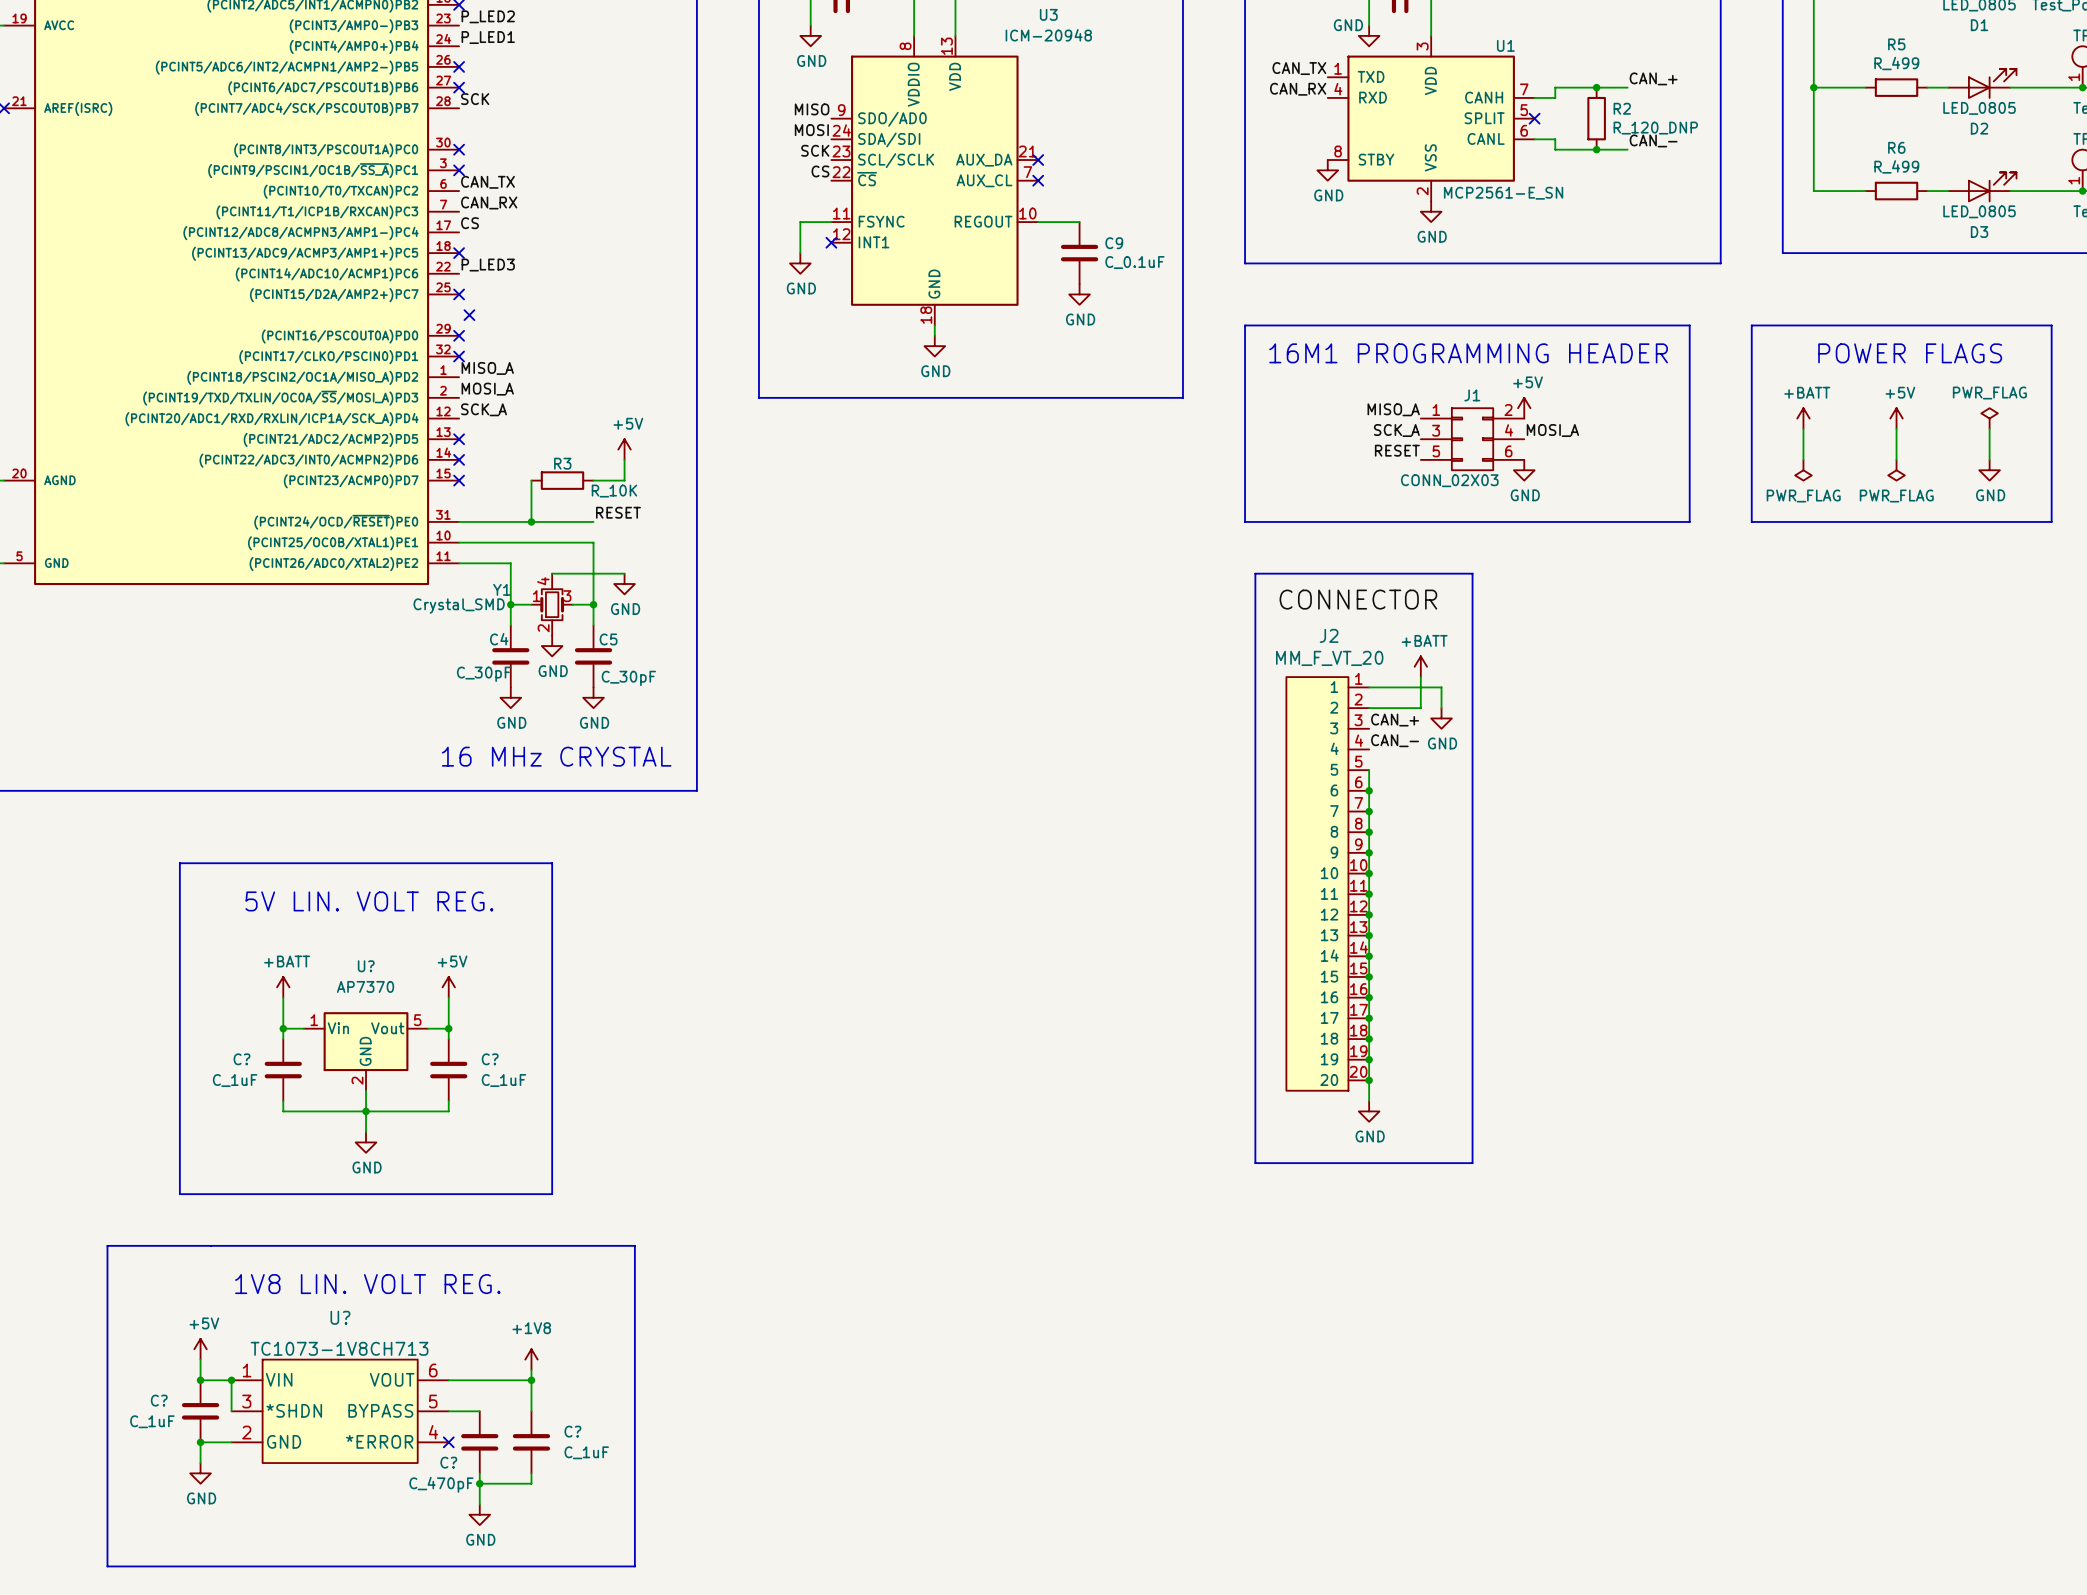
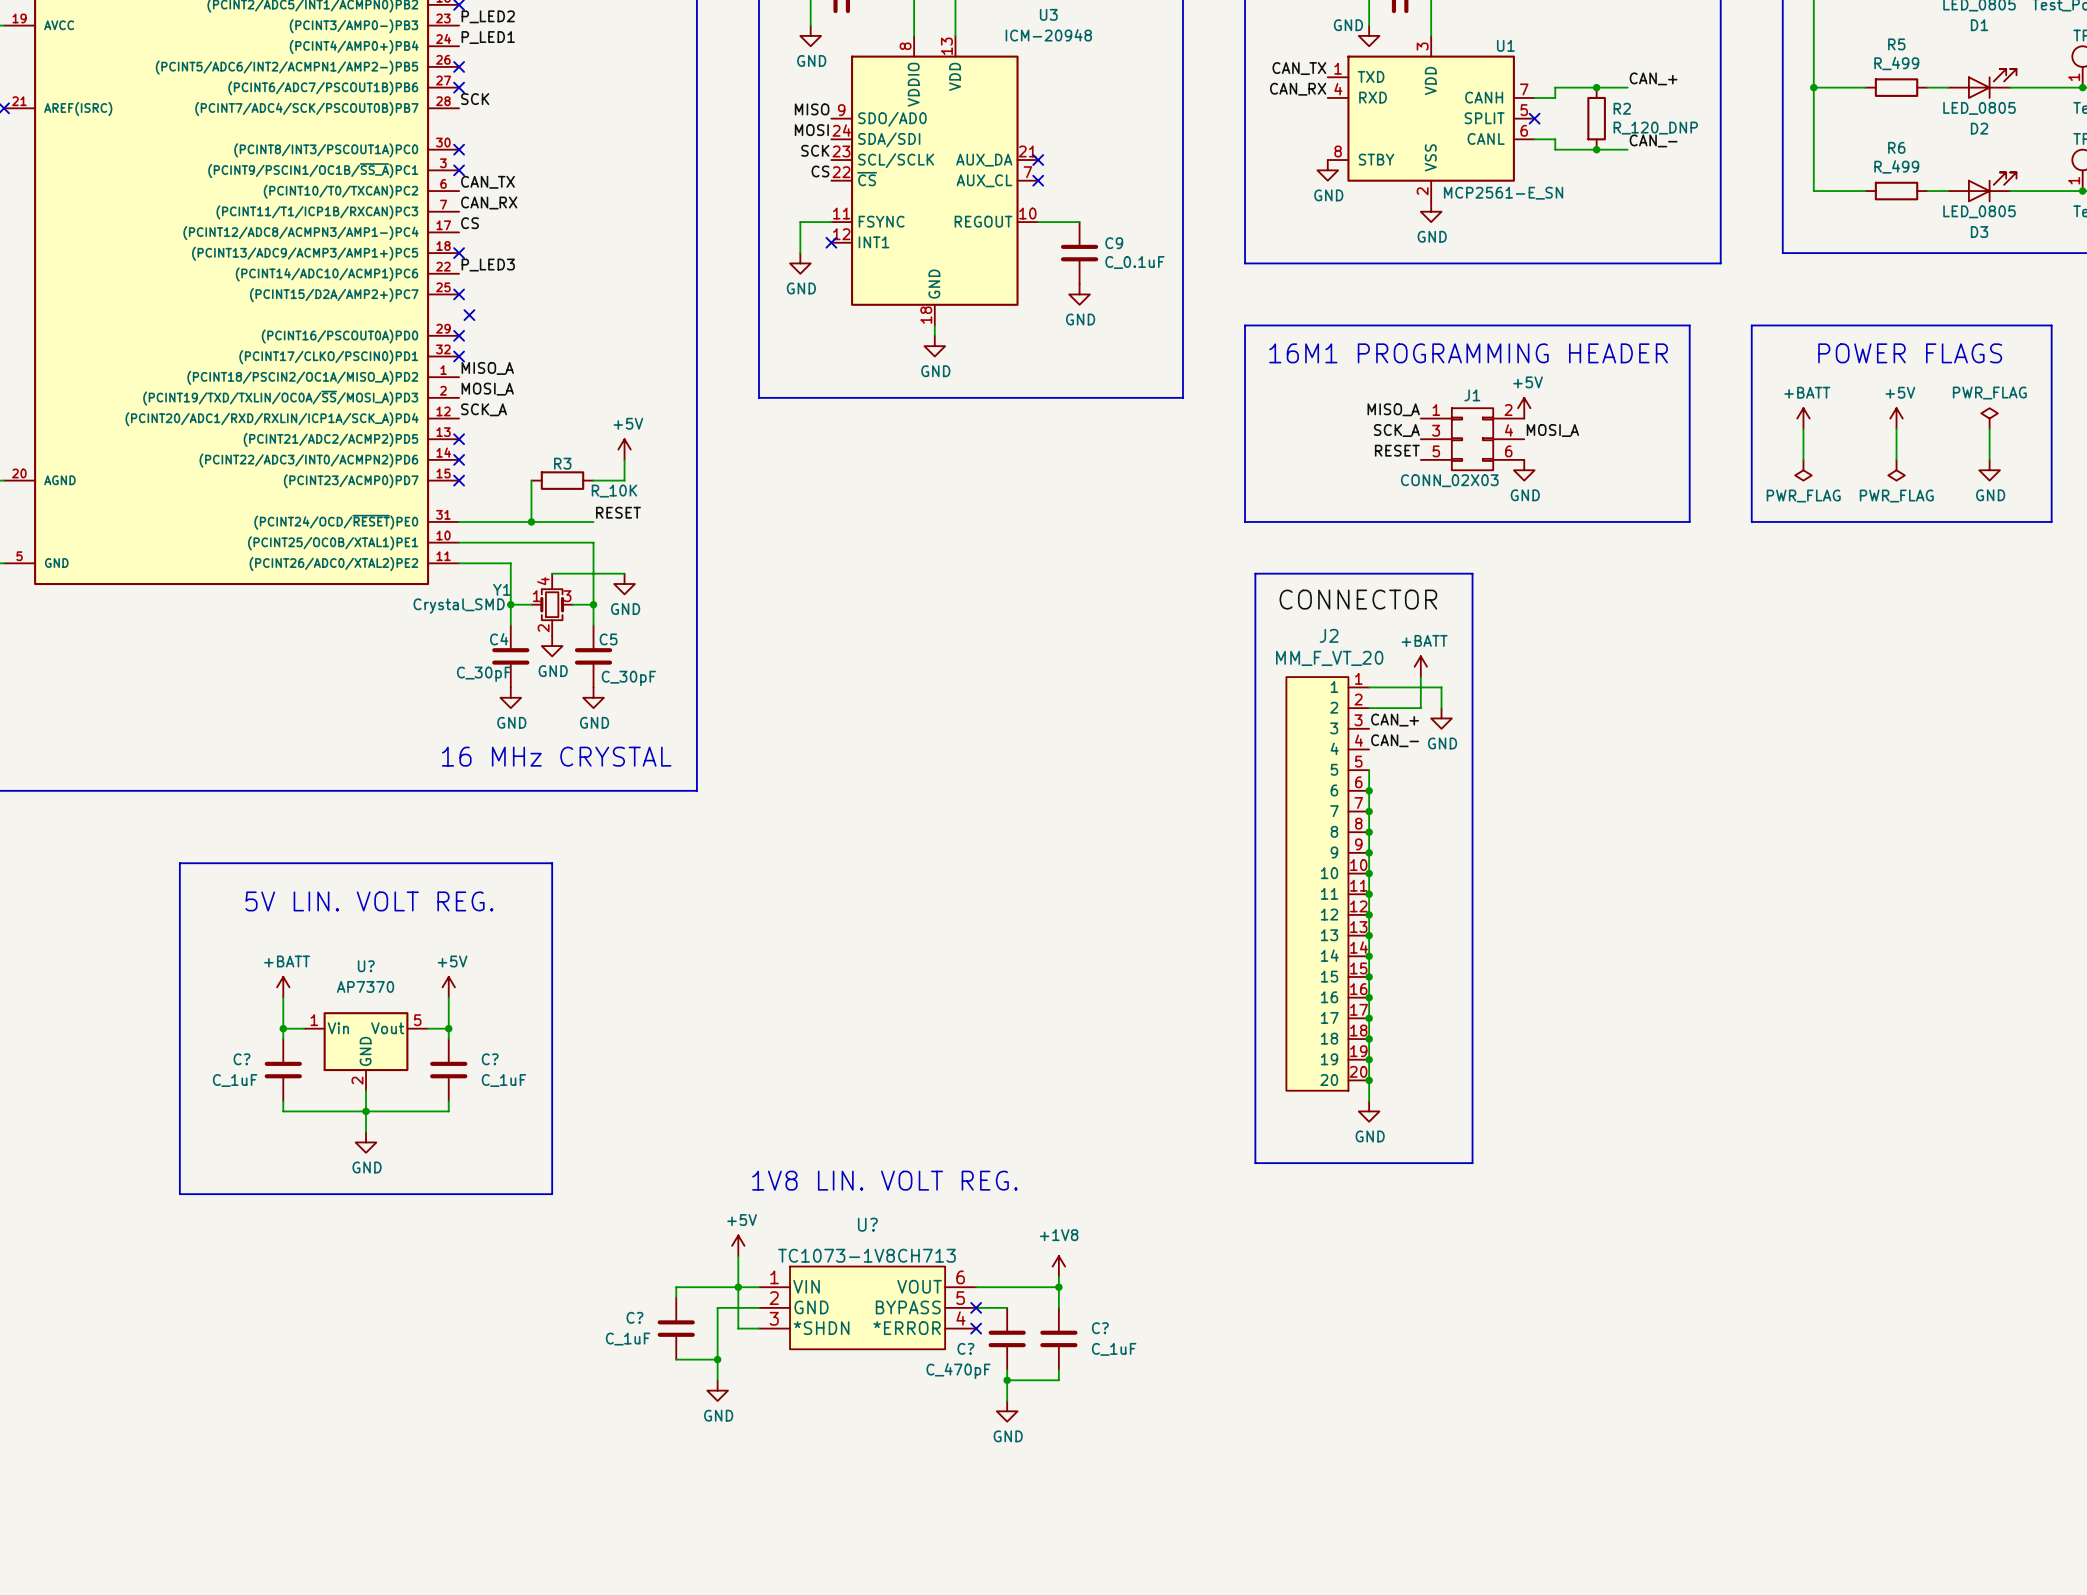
text: none -> 1V8 LIN. VOLT REG. (884, 1180)
line: (107, 1245) (634, 1245) (634, 1566) (107, 1566) (107, 1245) -> none
power symbol: none -> +5V (738, 1245)
wire: none -> (738, 1256) (738, 1328) (758, 1328)
power symbol: none -> +1V8 (1058, 1266)
wire: none -> (1058, 1276) (1058, 1307)
text: 1V8 LIN. VOLT REG. (367, 1284) -> none
junction: none -> (738, 1287)
wire: none -> (758, 1287) (676, 1287) (676, 1297)
wire: none -> (976, 1287) (1058, 1287)
junction: none -> (1058, 1287)
wire: none -> (758, 1307) (717, 1307) (717, 1380)
U?: none -> TC1073-1V8CH713 (867, 1307)
wire: none -> (976, 1307) (1007, 1307)
no-connect mark: none -> (976, 1307)
no-connect mark: none -> (976, 1328)
C?: none -> C_470pF (1007, 1338)
C?: none -> C_1uF (1058, 1338)
power symbol: +5V (200, 1349) -> none
wire: (200, 1359) (200, 1380) (231, 1380) (231, 1411) -> none
power symbol: +1V8 (531, 1359) -> none
wire: none -> (676, 1359) (717, 1359)
junction: none -> (717, 1359)
wire: (531, 1369) (531, 1411) -> none
wire: none -> (1007, 1369) (1007, 1400)
wire: none -> (1058, 1369) (1058, 1380) (1007, 1380)
junction: (200, 1380) -> none
junction: (231, 1380) -> none
wire: (448, 1380) (531, 1380) -> none
junction: (531, 1380) -> none
junction: none -> (1007, 1380)
power symbol: none -> GND (717, 1390)
C?: C_1uF (200, 1411) -> none
U?: TC1073-1V8CH713 (340, 1411) -> none
wire: (448, 1411) (479, 1411) -> none
power symbol: none -> GND (1007, 1411)
C? name position: C? (572, 1431) -> C? (634, 1317)
junction: (200, 1442) -> none
wire: (231, 1442) (200, 1442) (200, 1463) -> none
no-connect mark: (448, 1442) -> none
C?: C_470pF (479, 1442) -> none
C? position: (531, 1442) -> (676, 1328)
C? value position: C_1uF (586, 1452) -> C_1uF (628, 1339)
power symbol: GND (200, 1473) -> none
wire: (479, 1473) (479, 1504) -> none
wire: (531, 1473) (531, 1483) (479, 1483) -> none
junction: (479, 1483) -> none
power symbol: GND (479, 1514) -> none

